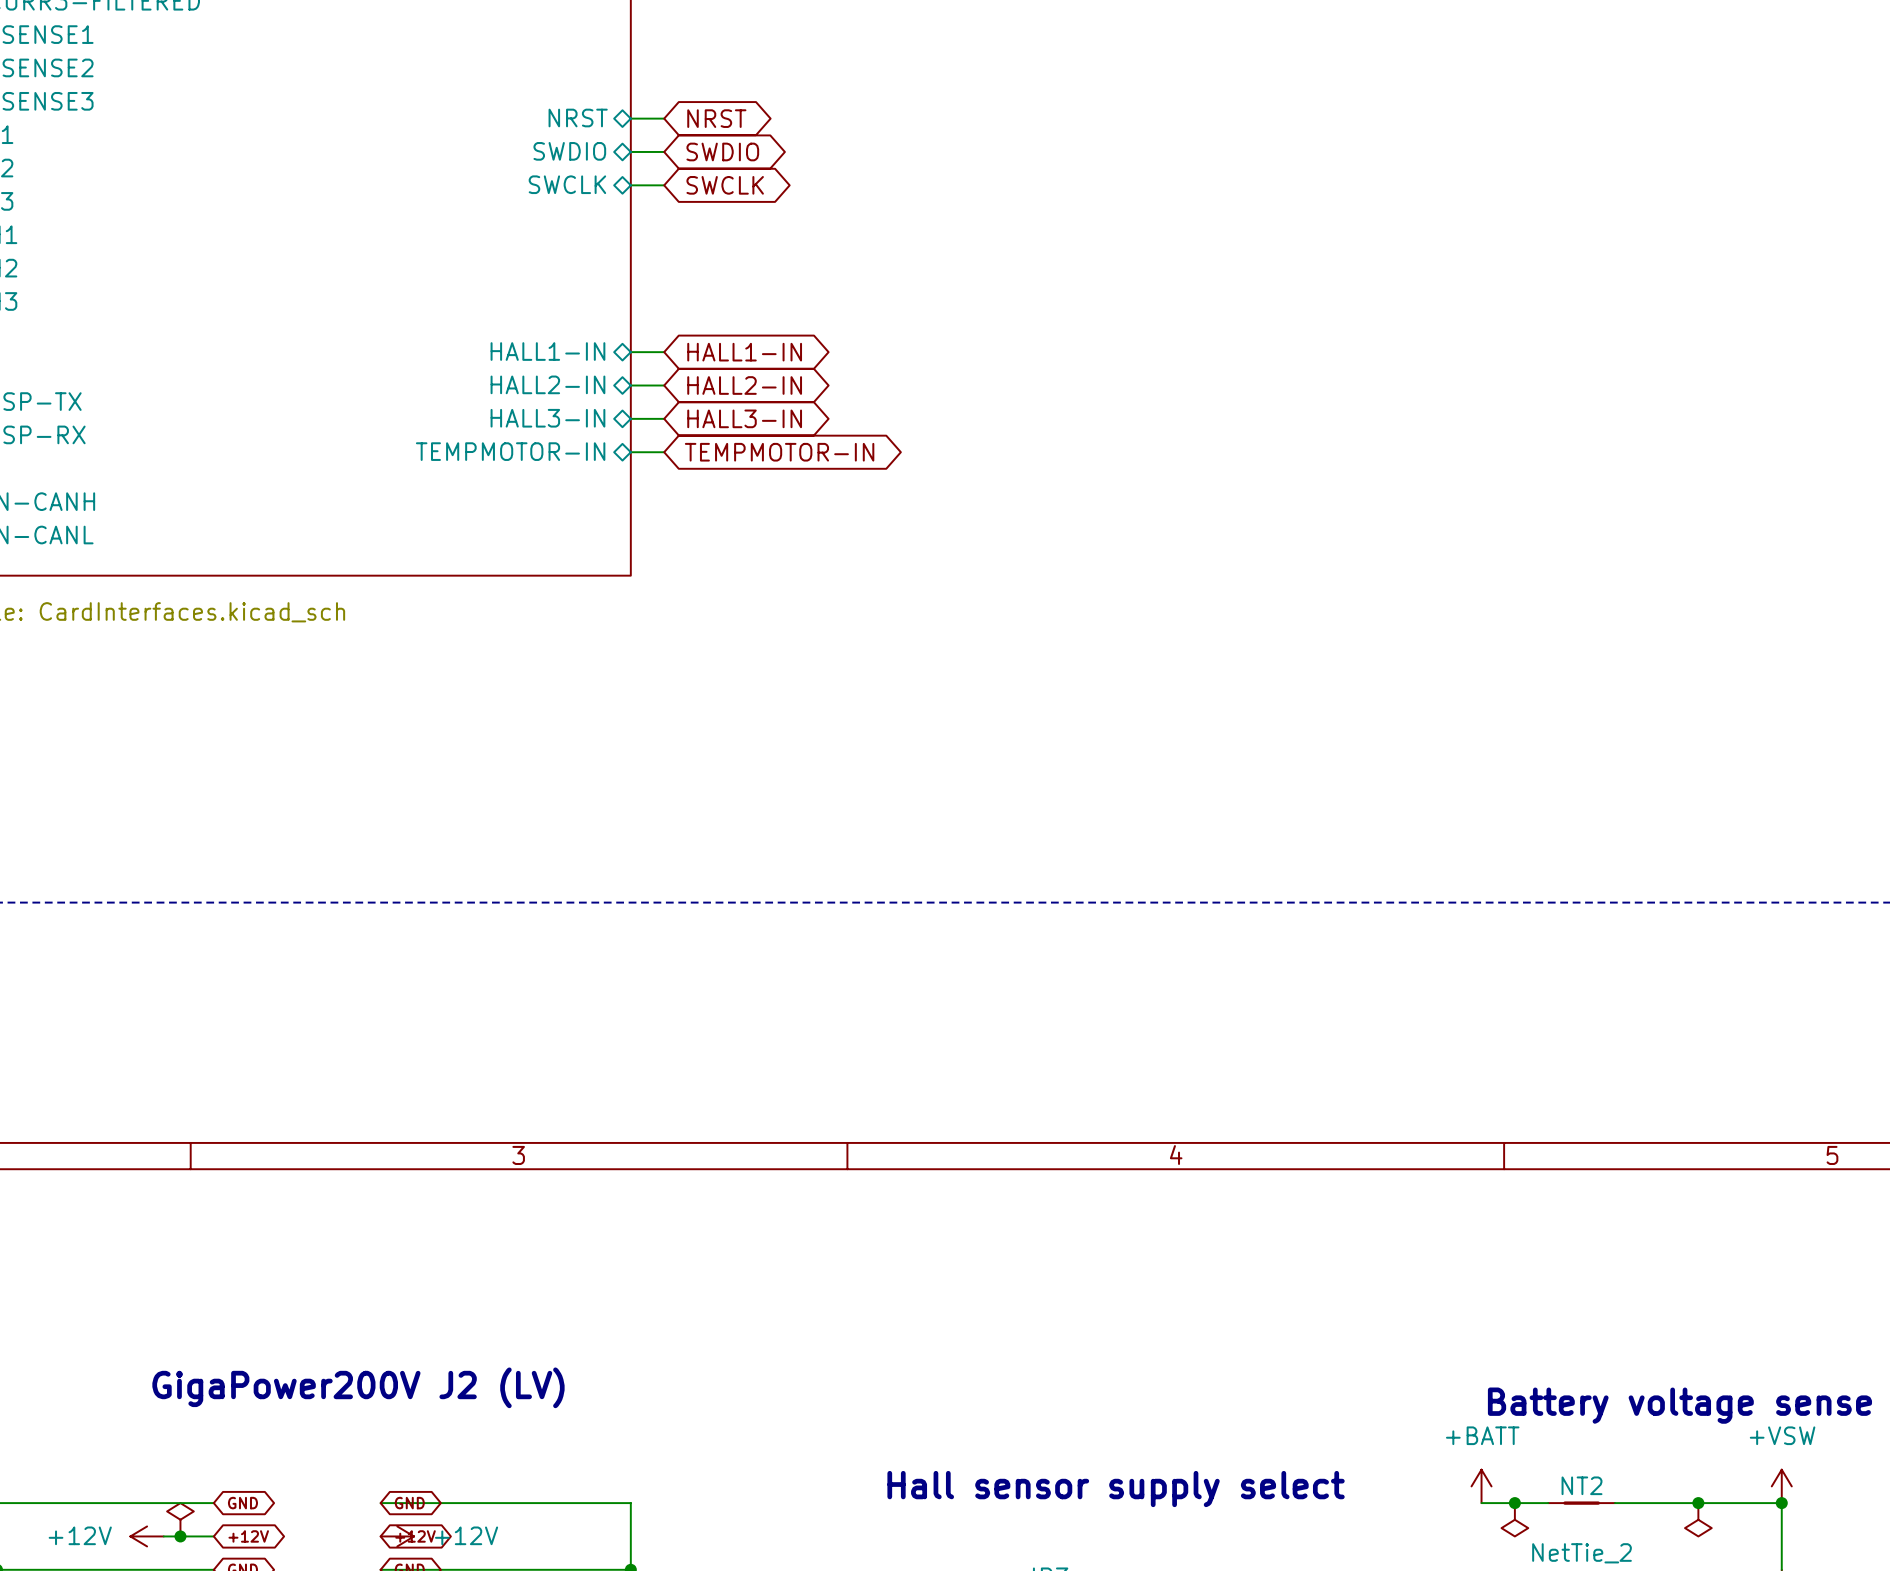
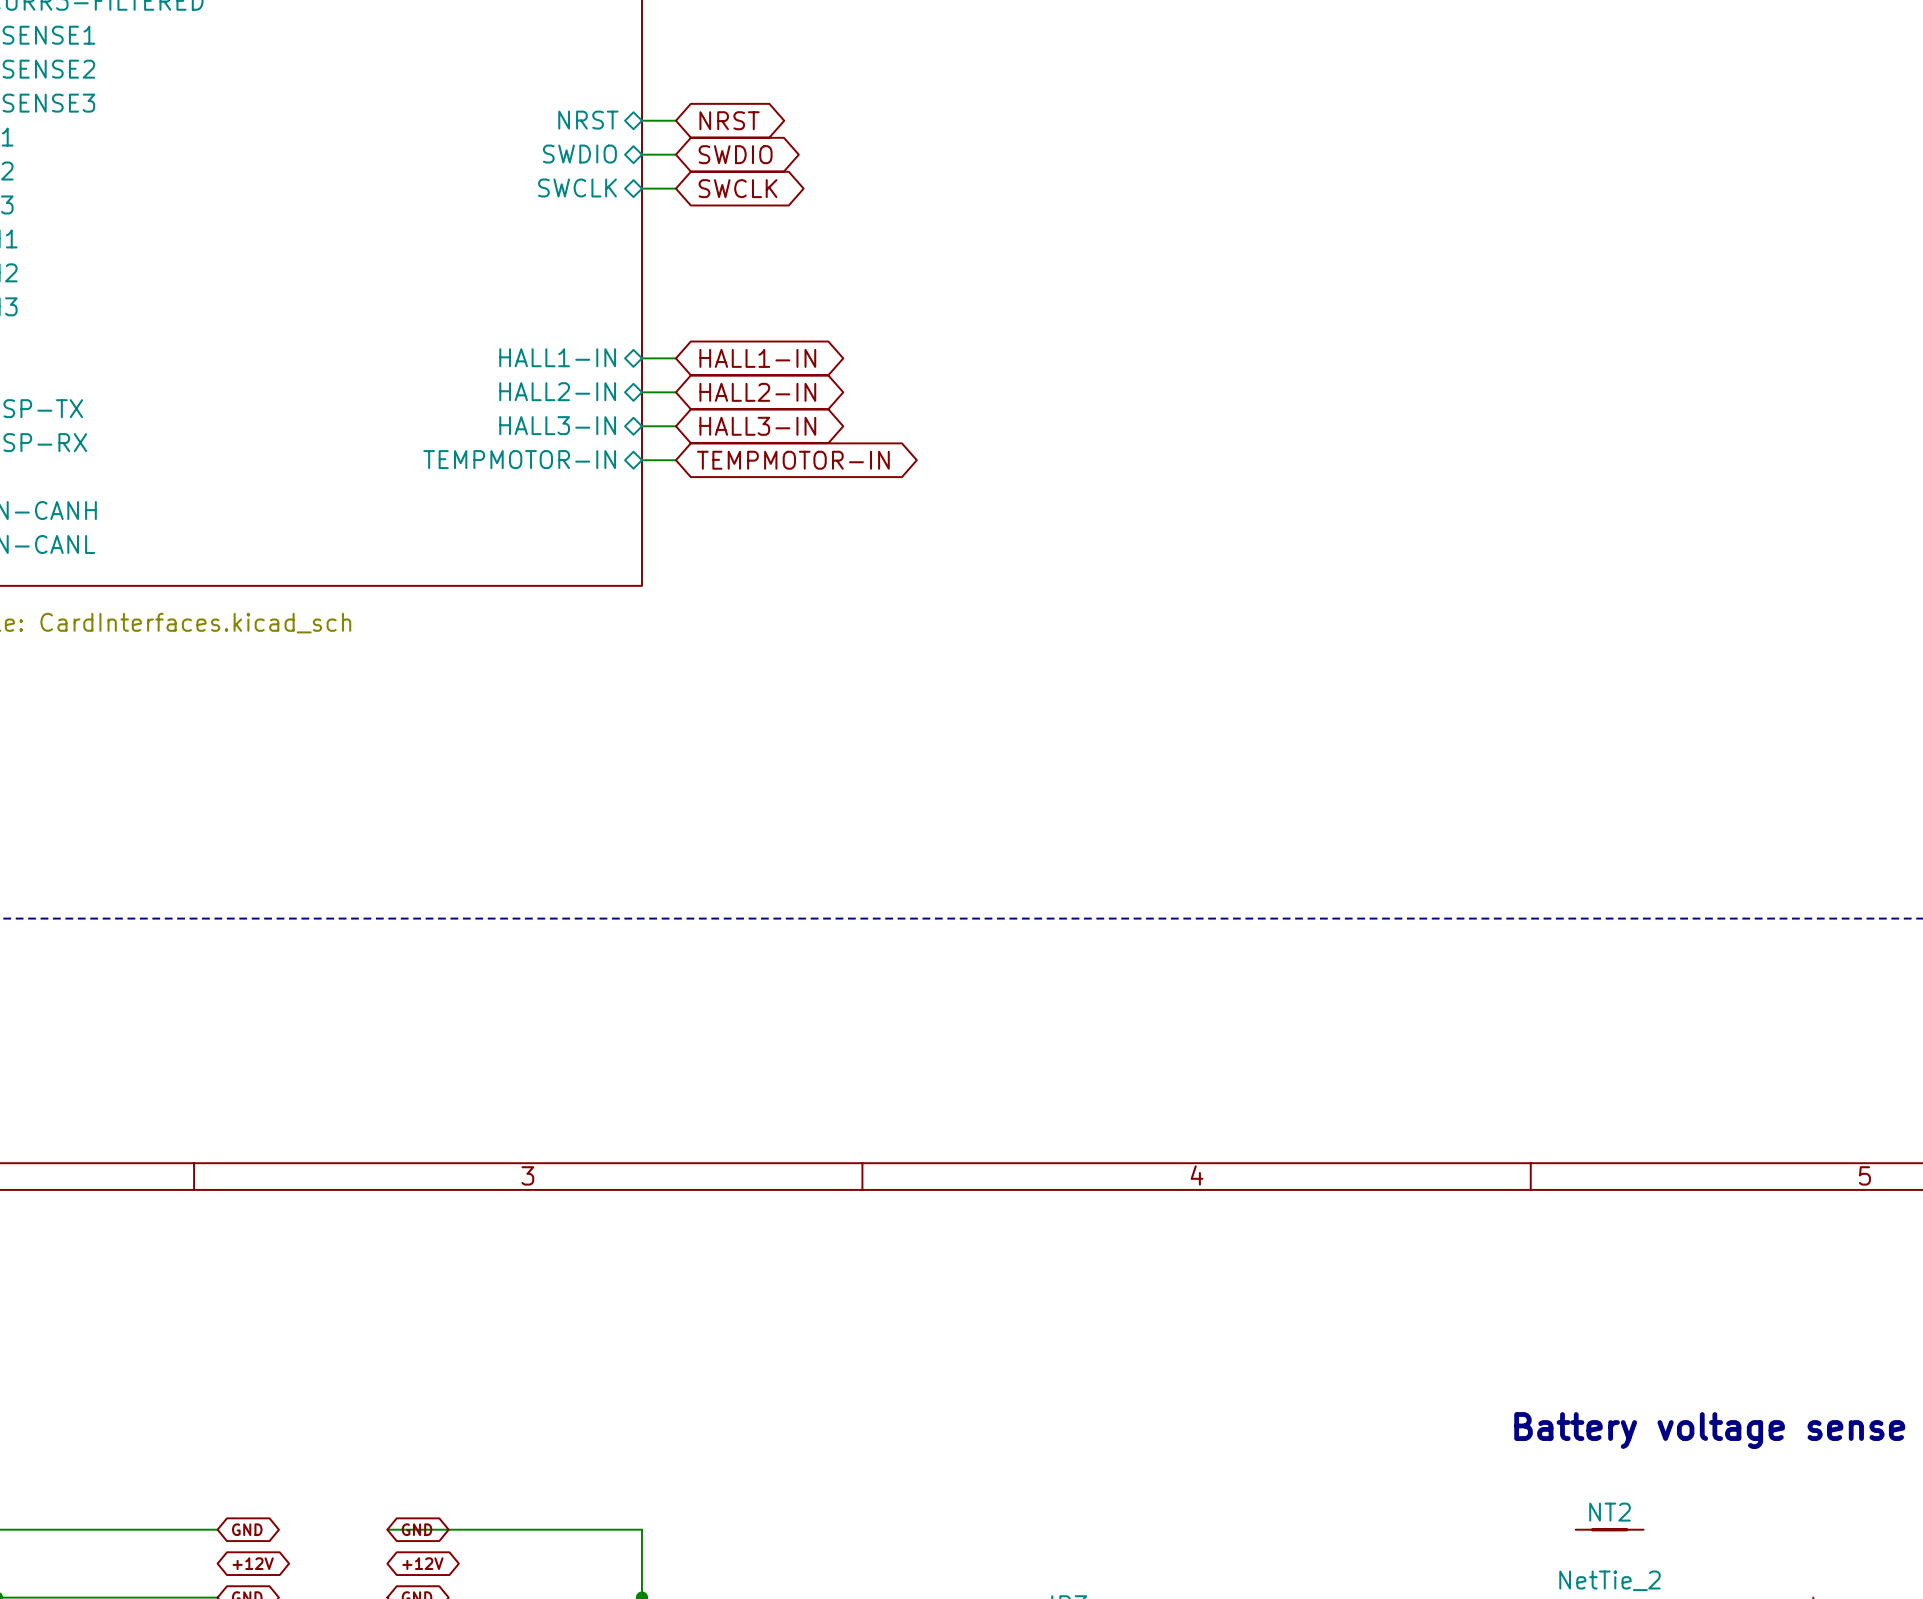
text: GigaPower200V J2 (LV) (358, 1387) -> none
power symbol: +BATT (1481, 1486) -> none
power symbol: +VSW (1781, 1486) -> none
text: Hall sensor supply select (1116, 1489) -> none
wire: (1481, 1503) (1548, 1503) -> none
junction: (1514, 1503) -> none
wire: (1614, 1503) (1781, 1503) (1781, 1569) -> none
junction: (1698, 1503) -> none
junction: (1781, 1503) -> none
power symbol: (180, 1519) -> none
power symbol: (1514, 1519) -> none
power symbol: (1698, 1519) -> none
power symbol: +12V (147, 1536) -> none
wire: (163, 1536) (213, 1536) -> none
junction: (180, 1536) -> none
power symbol: +12V (397, 1536) -> none
wire: (380, 1569) (630, 1569) -> none

